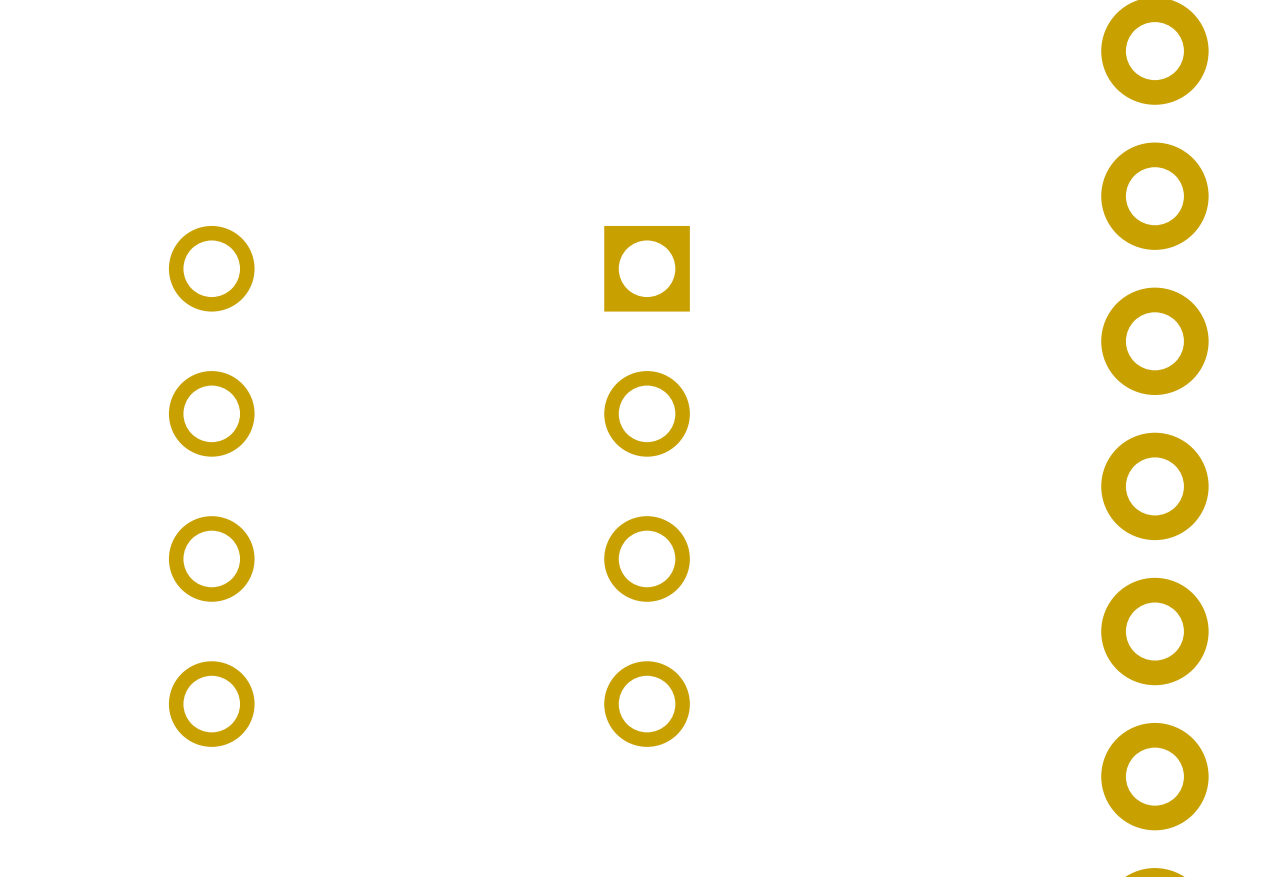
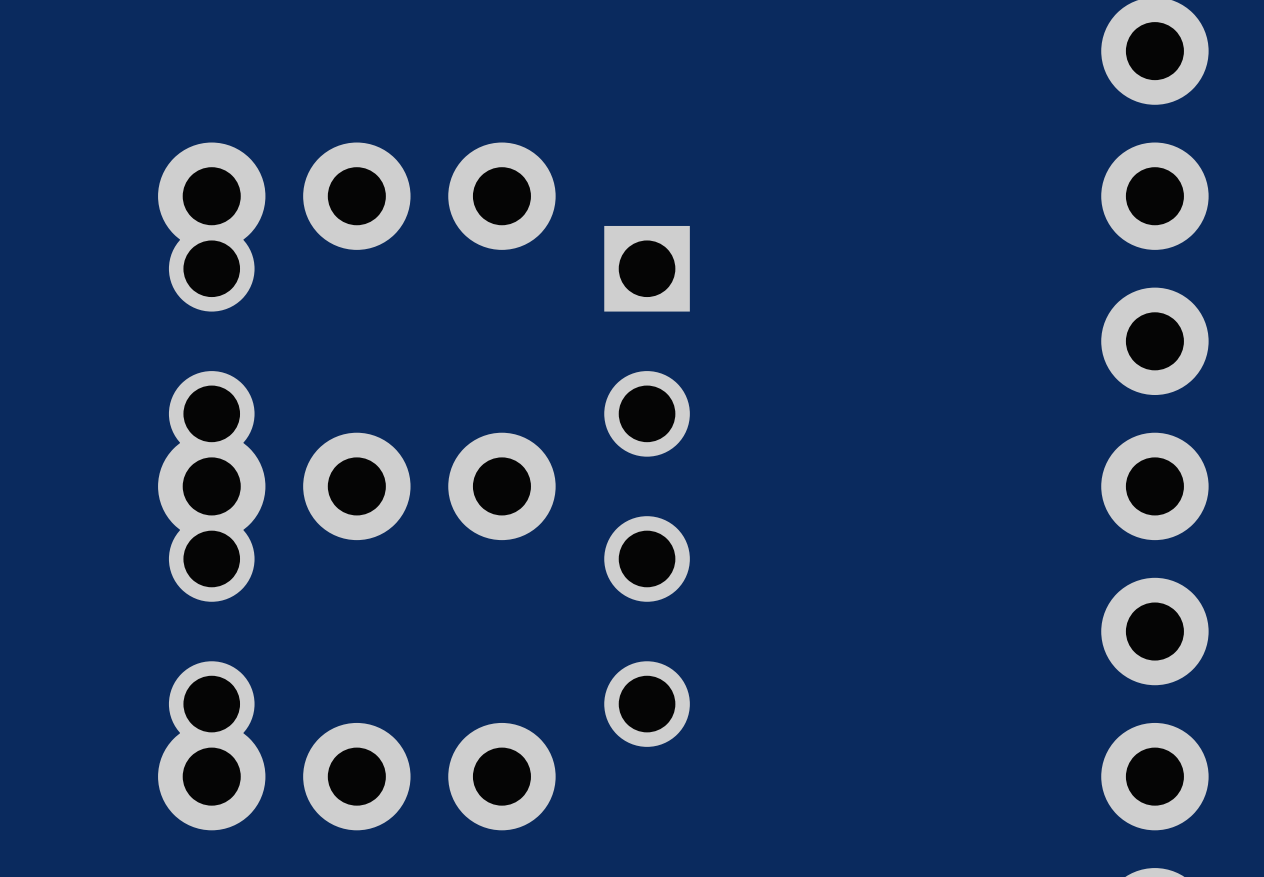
part: none -> (356, 196)
part: none -> (356, 486)
part: none -> (356, 776)

